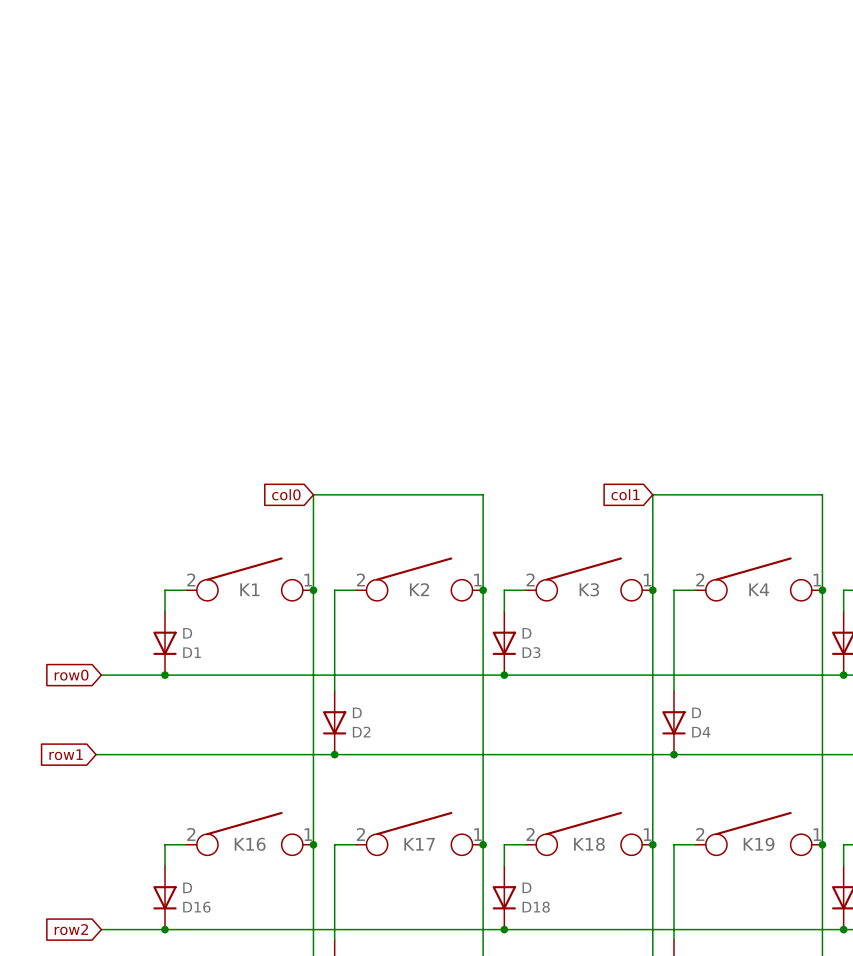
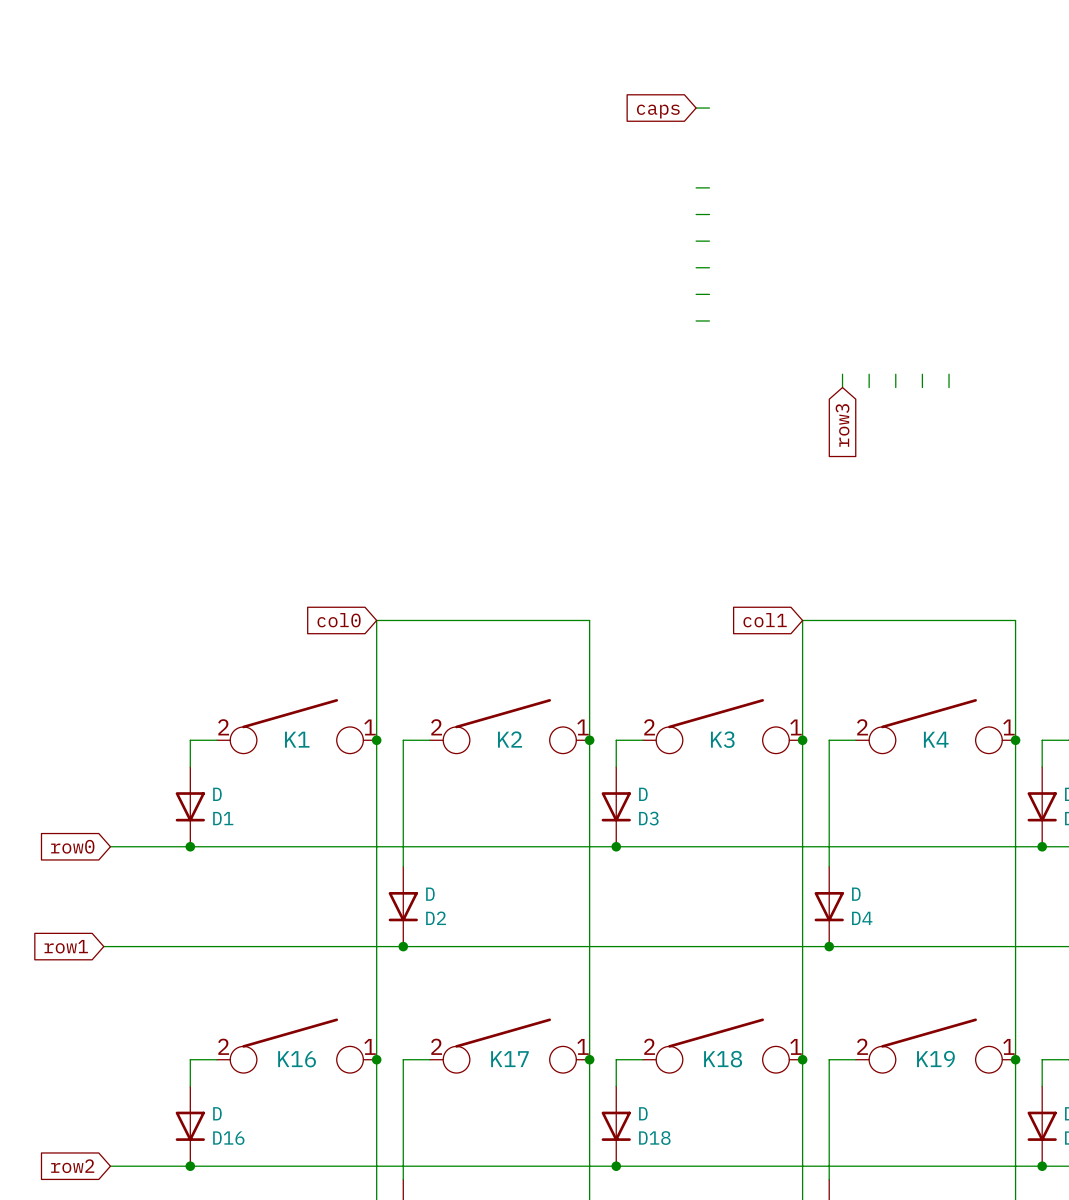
wire: none -> (696, 108) (709, 108)
global label: none -> caps (658, 111)
wire: none -> (696, 187) (709, 187)
wire: none -> (696, 214) (709, 214)
wire: none -> (696, 241) (709, 241)
wire: none -> (696, 267) (709, 267)
wire: none -> (696, 294) (709, 294)
wire: none -> (696, 320) (709, 320)
wire: none -> (842, 374) (842, 387)
wire: none -> (869, 374) (869, 387)
wire: none -> (895, 374) (895, 387)
wire: none -> (922, 374) (922, 387)
wire: none -> (949, 374) (949, 387)
global label: none -> row3 (842, 425)

